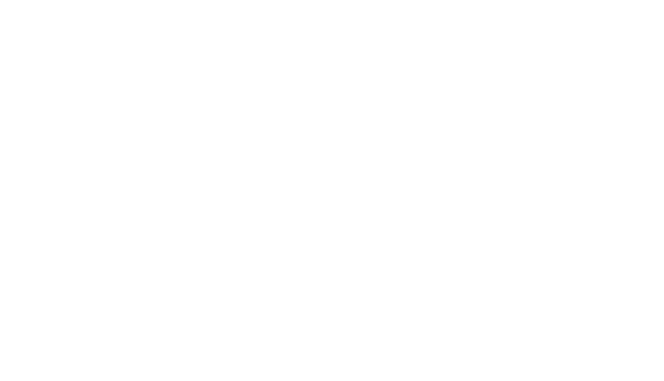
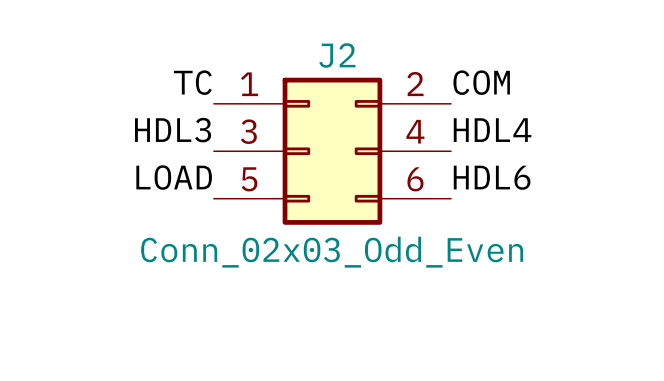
label: none -> TC (192, 82)
label: none -> COM (481, 82)
label: none -> HDL3 (173, 130)
label: none -> HDL4 (492, 130)
J2: none -> Conn_02x03_Odd_Even (332, 151)
label: none -> LOAD (174, 177)
label: none -> HDL6 (492, 177)

